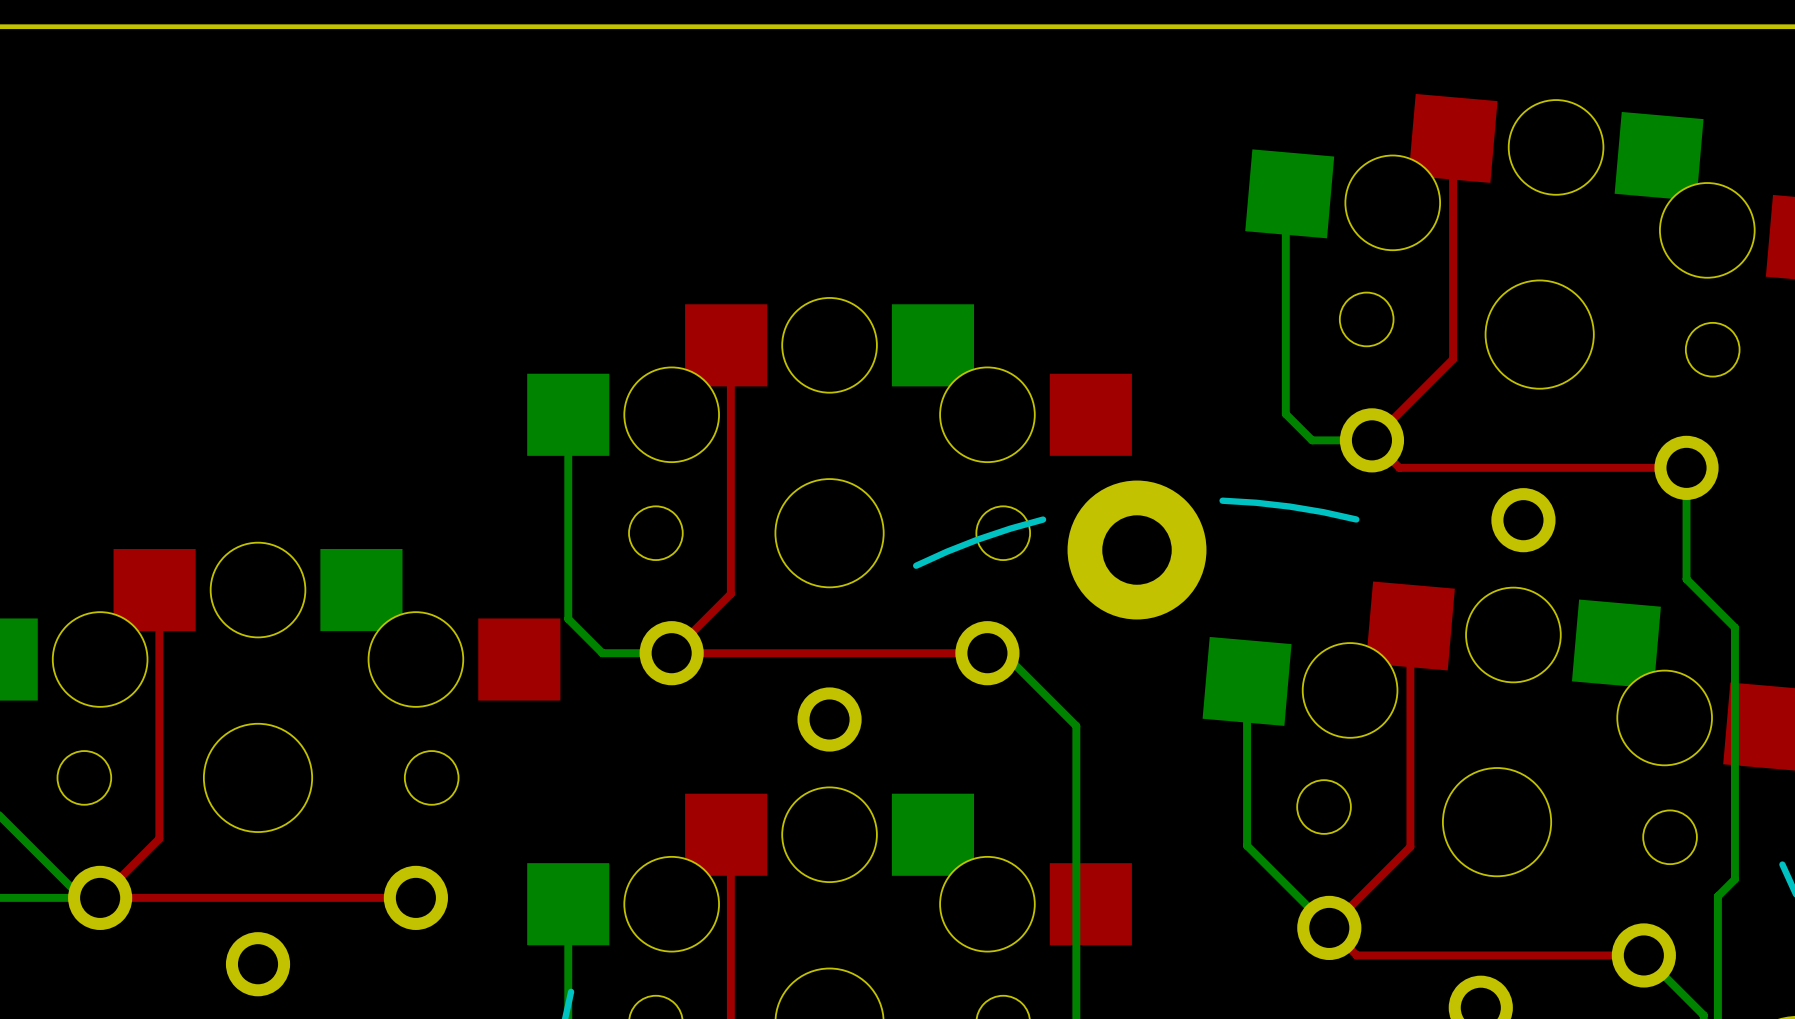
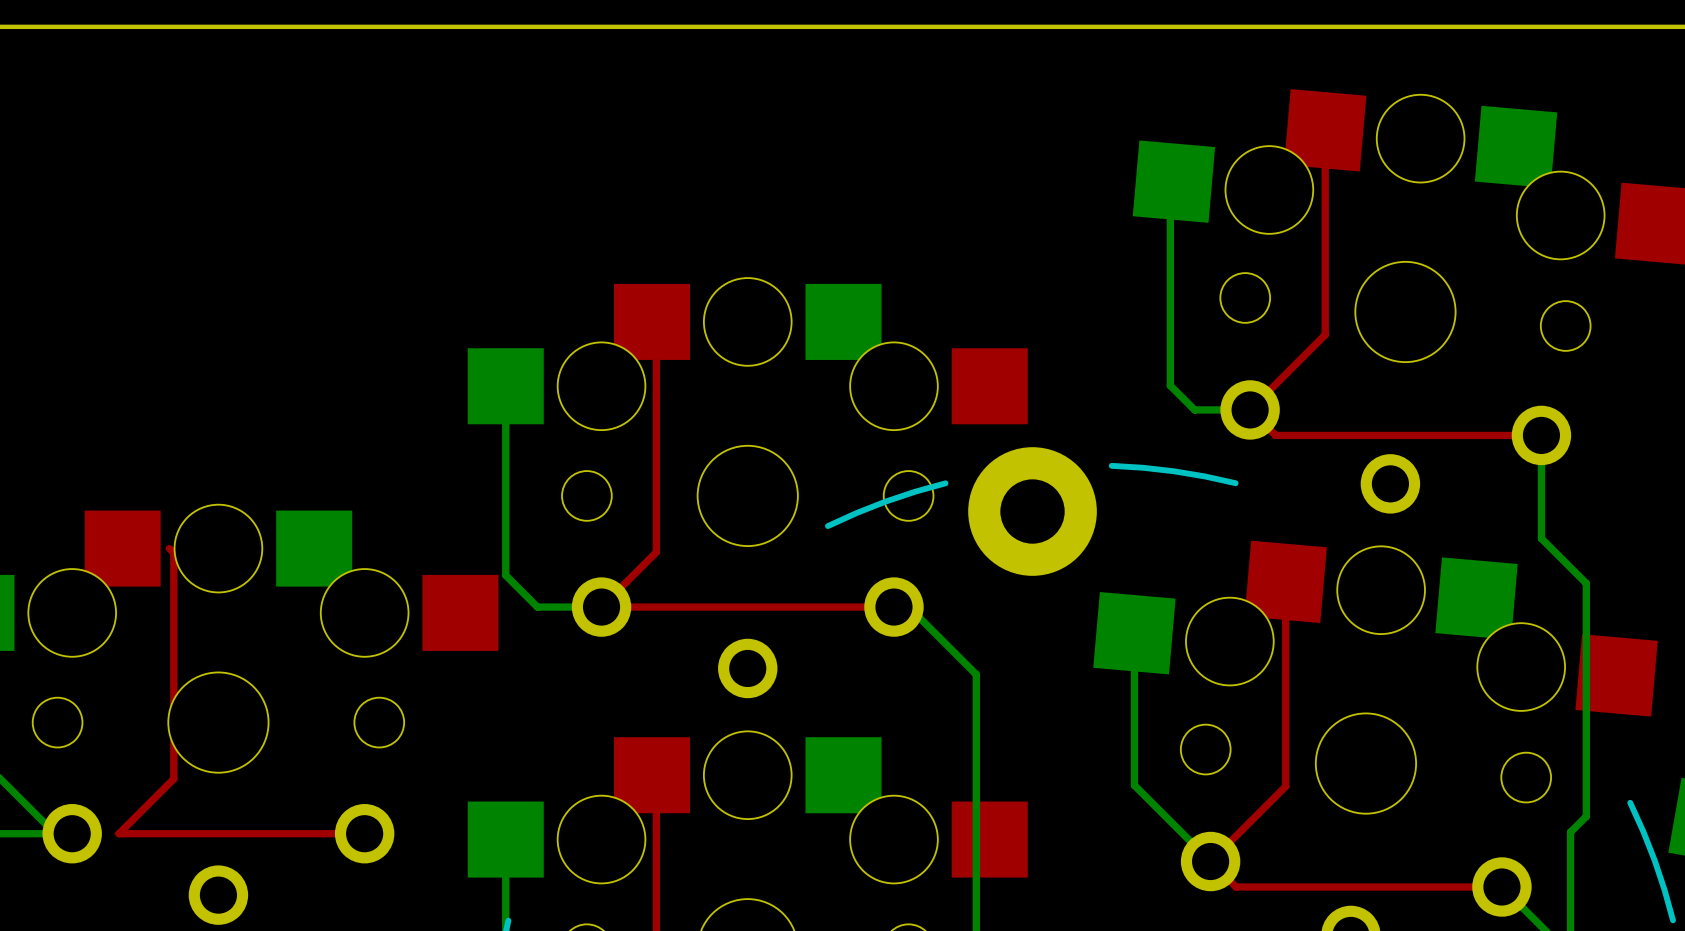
top track: (154, 590) (159, 594) (159, 838) (100, 897) (150, 897) -> (169, 548) (173, 552) (173, 778) (118, 833)

